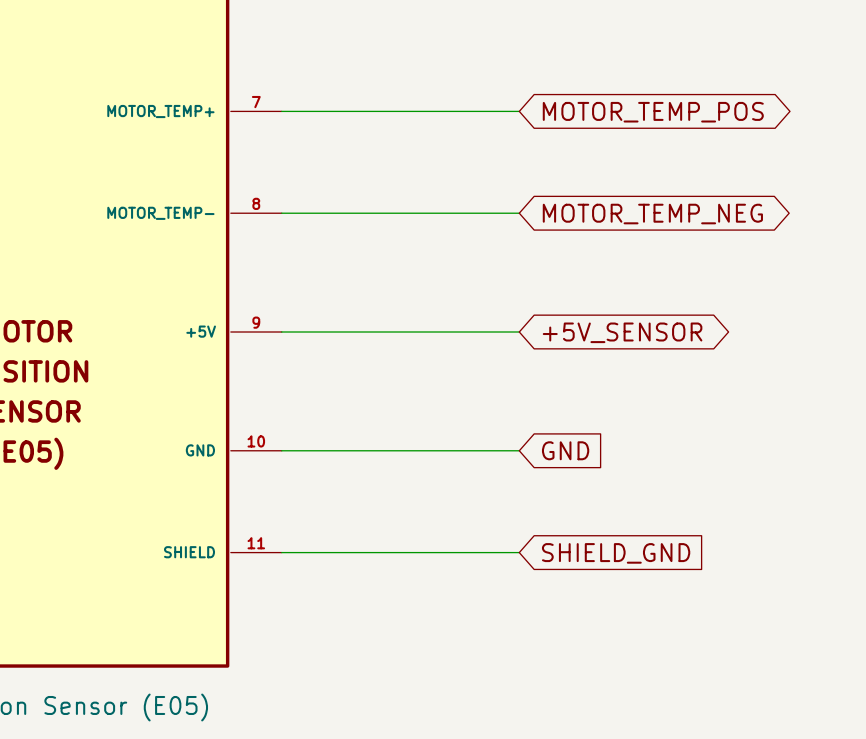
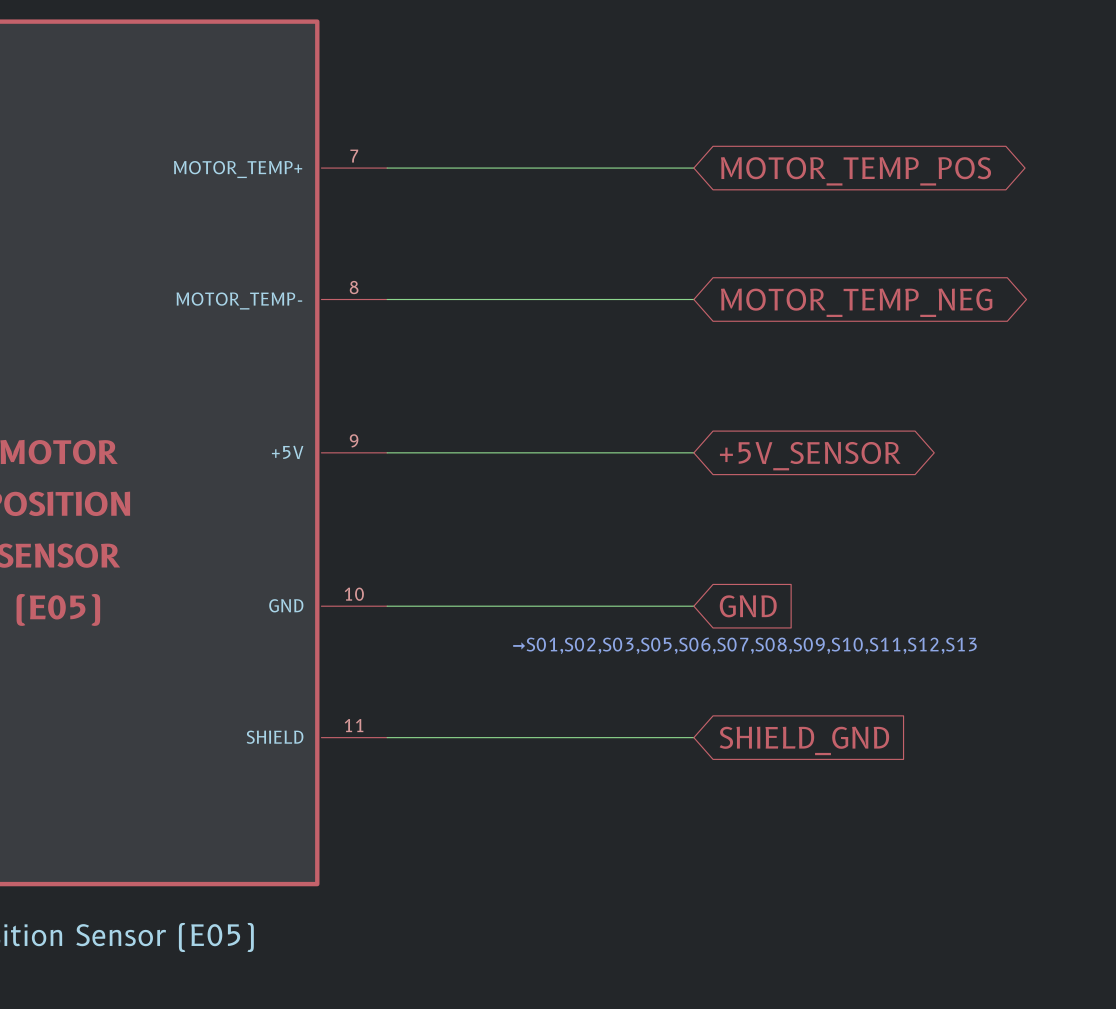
text: none -> →S01,S02,S03,S05,S06,S07,S08,S09,S10,S11,S12,S13 (744, 645)

